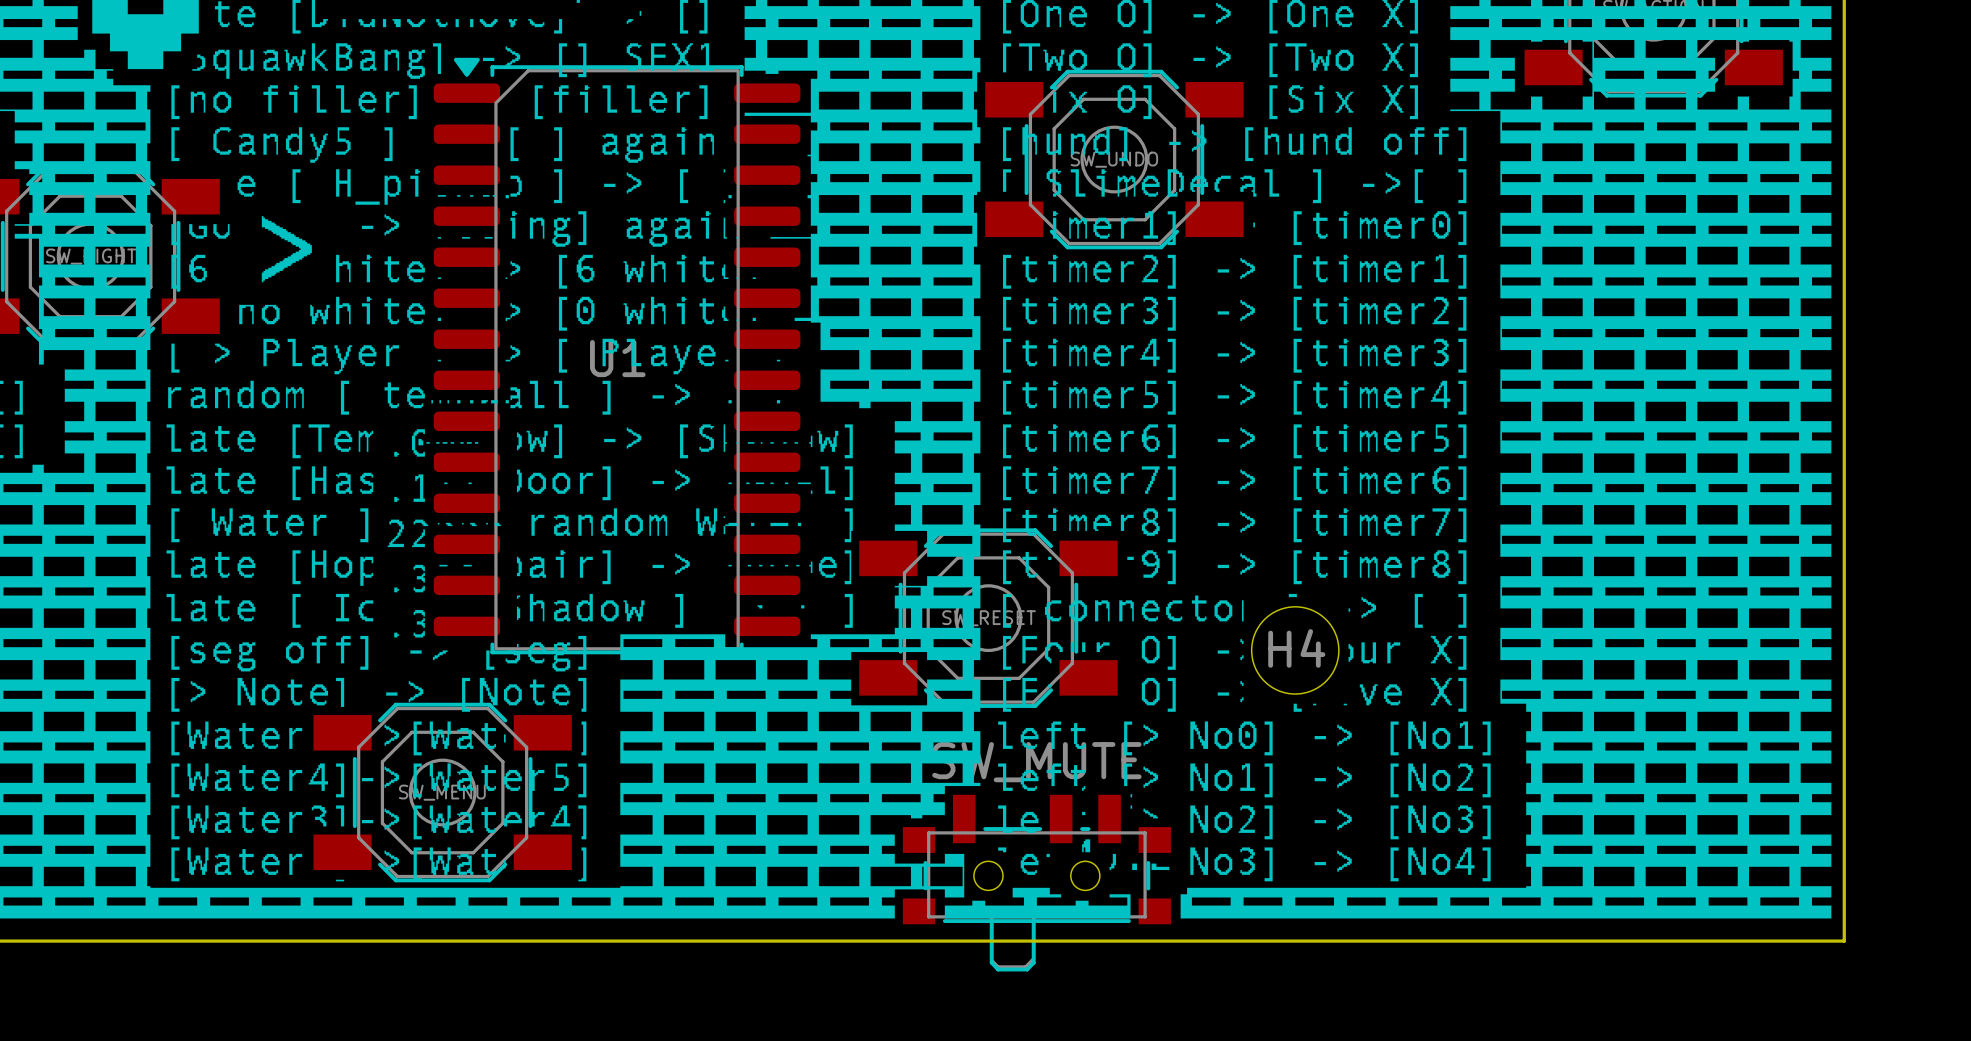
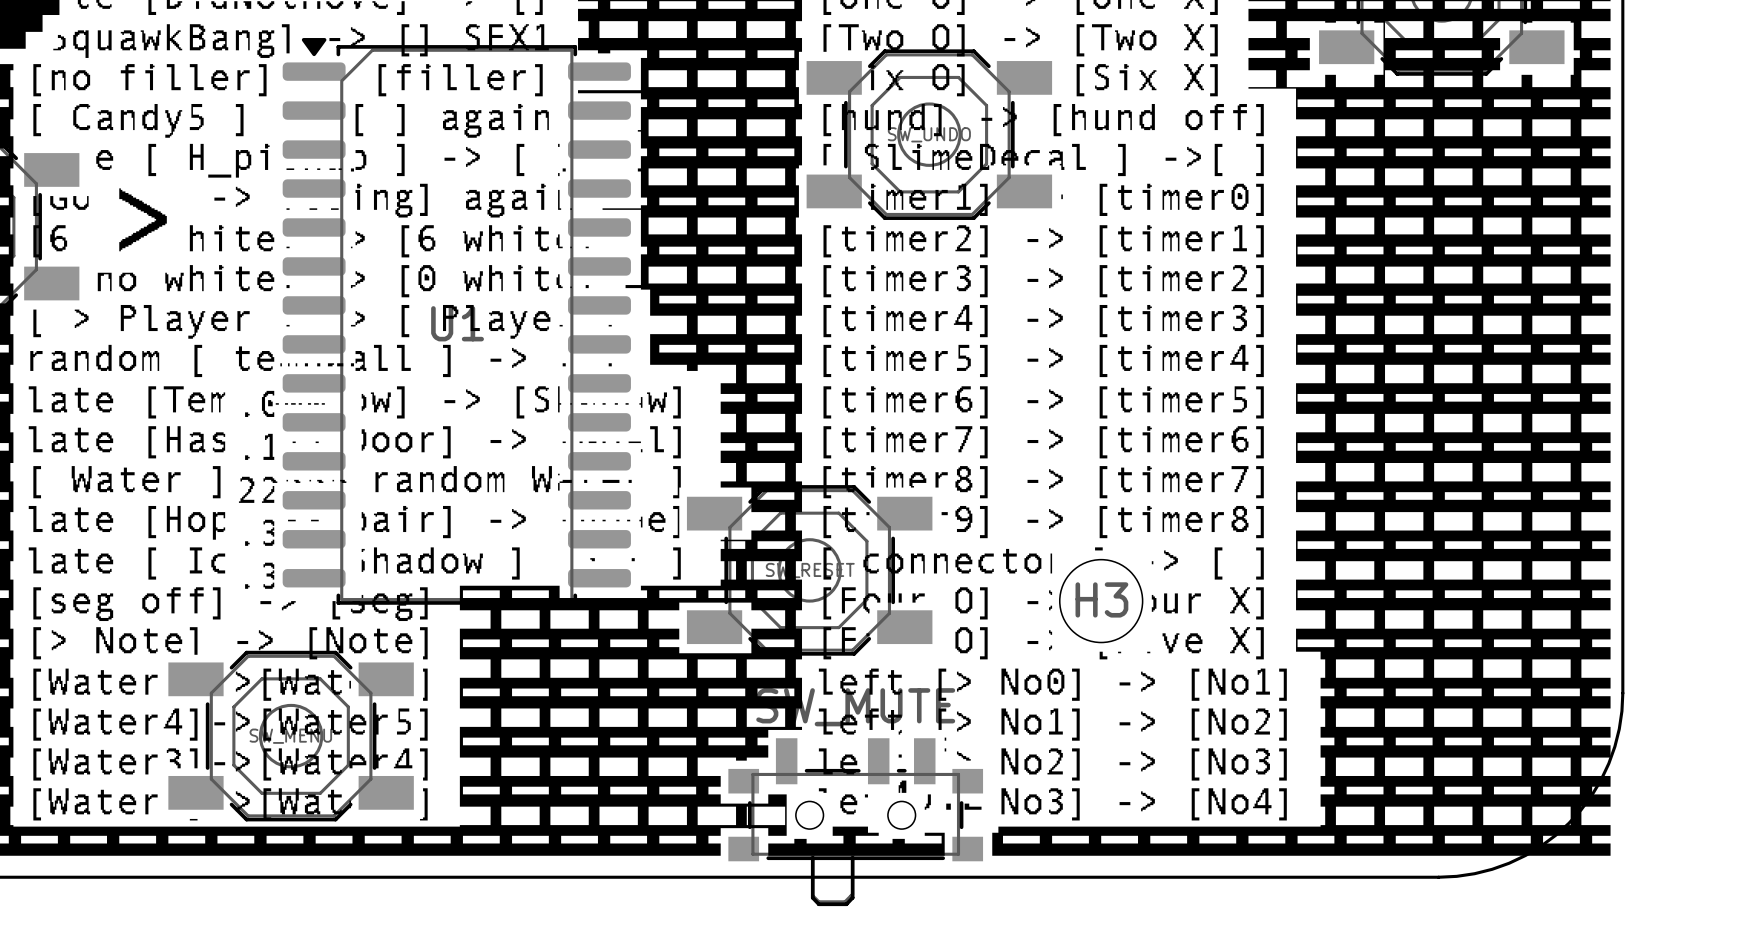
H4 name: H4 (1296, 648) -> H3 (1101, 599)
board edge: (1844, 747) (1844, 941) (1650, 941) -> (1622, 693) (1619, 729) (1608, 763) (1591, 795) (1568, 823) (1541, 846) (1509, 863) (1474, 873) (1438, 877)

